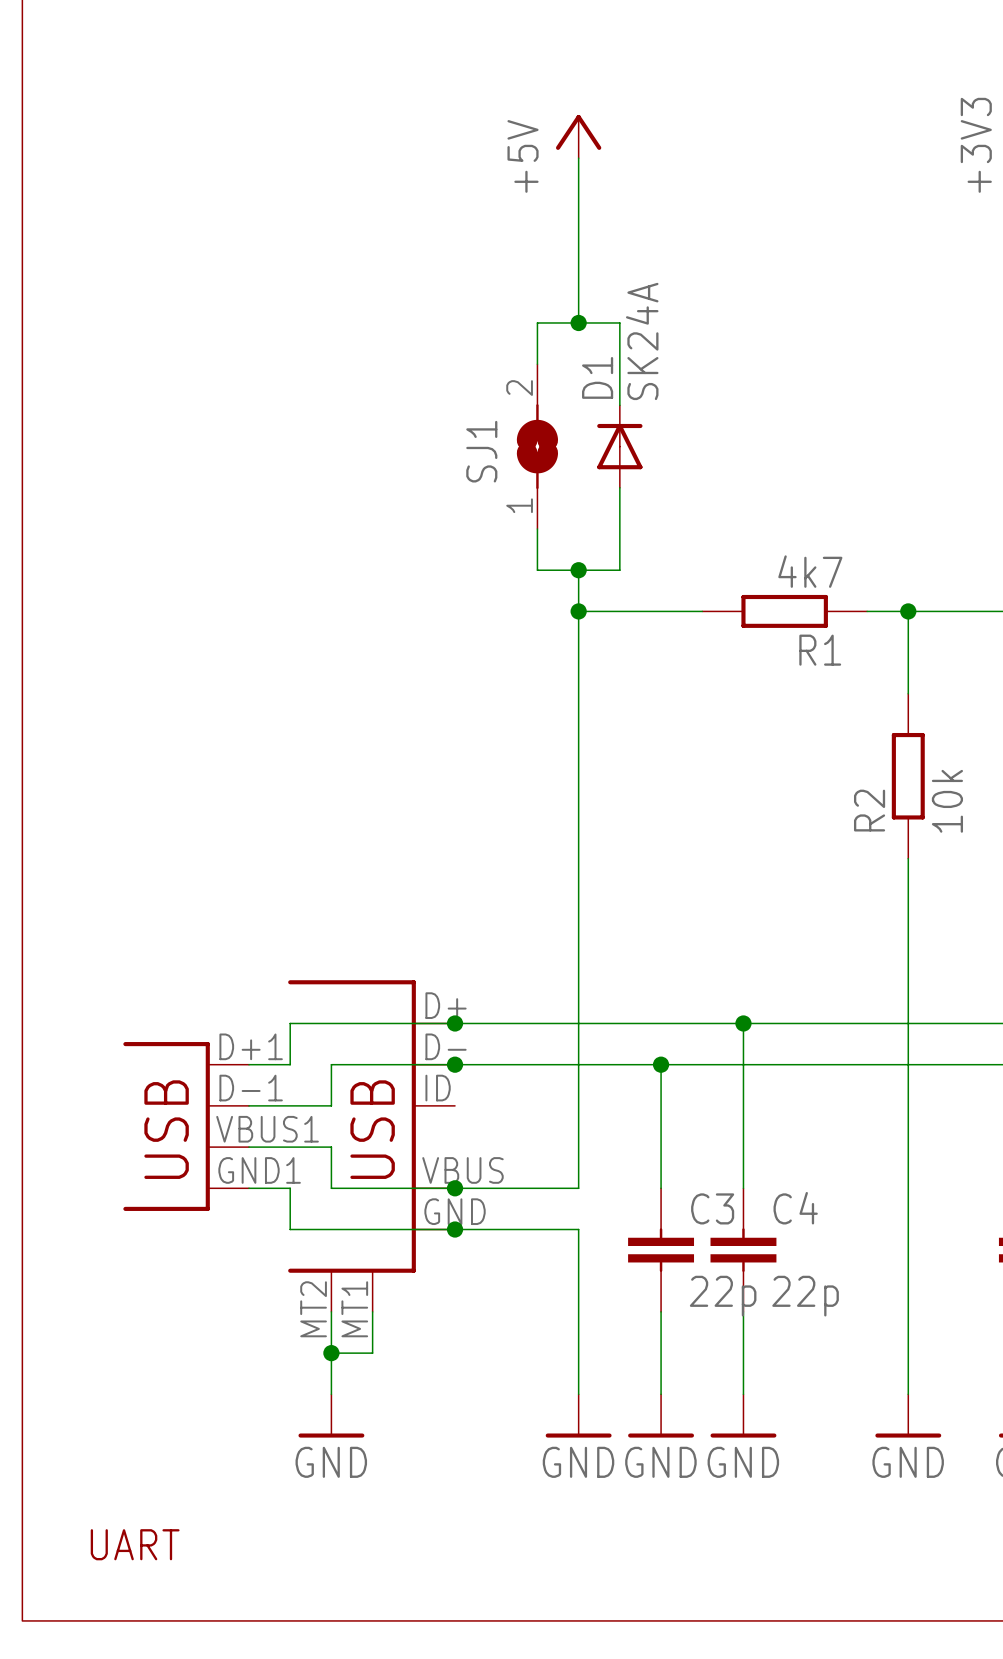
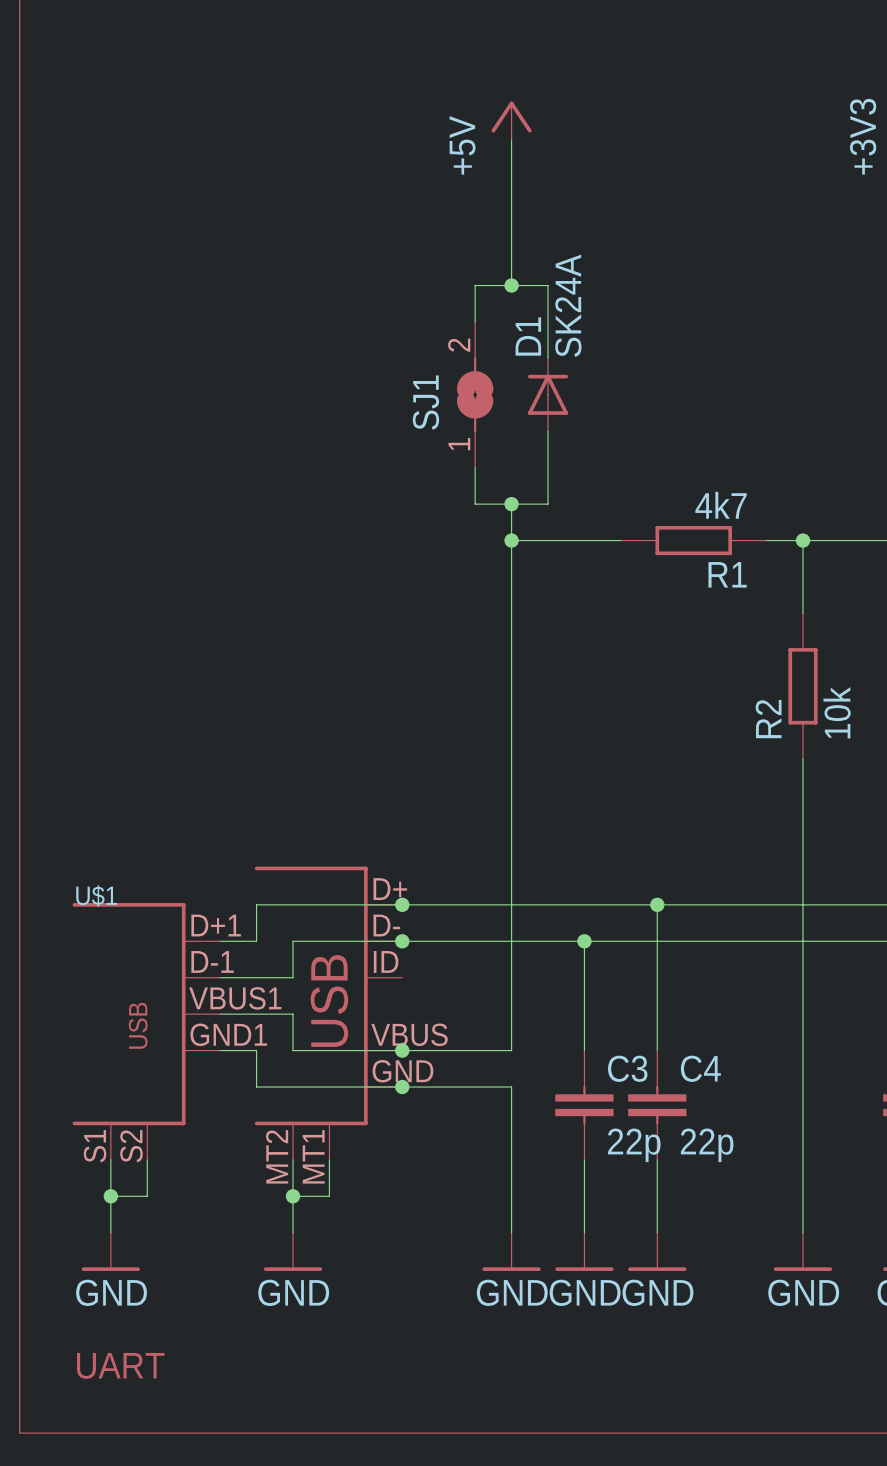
part: (186, 1126) -> none
U$1: none -> (146, 1031)
wire: none -> (110, 1159) (110, 1232)
wire: none -> (147, 1159) (147, 1196) (110, 1196)
junction: none -> (110, 1196)
power symbol: none -> GND (110, 1251)

